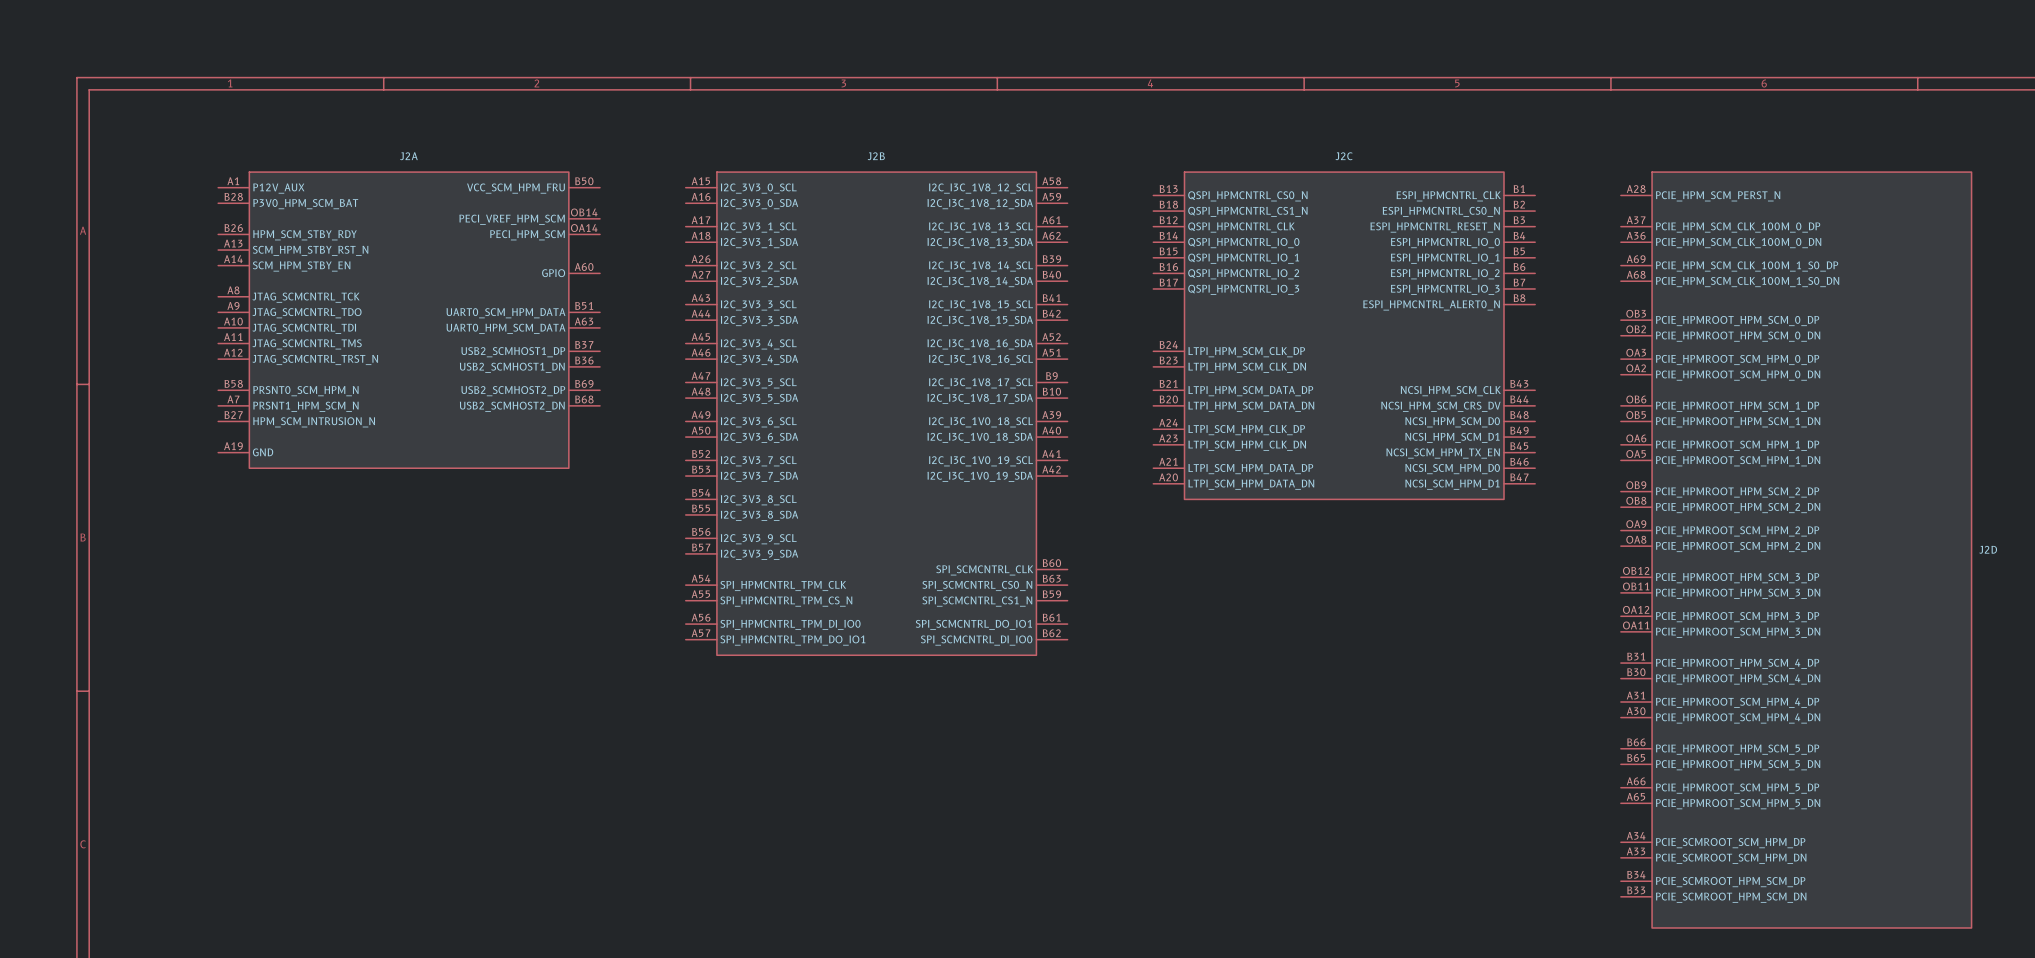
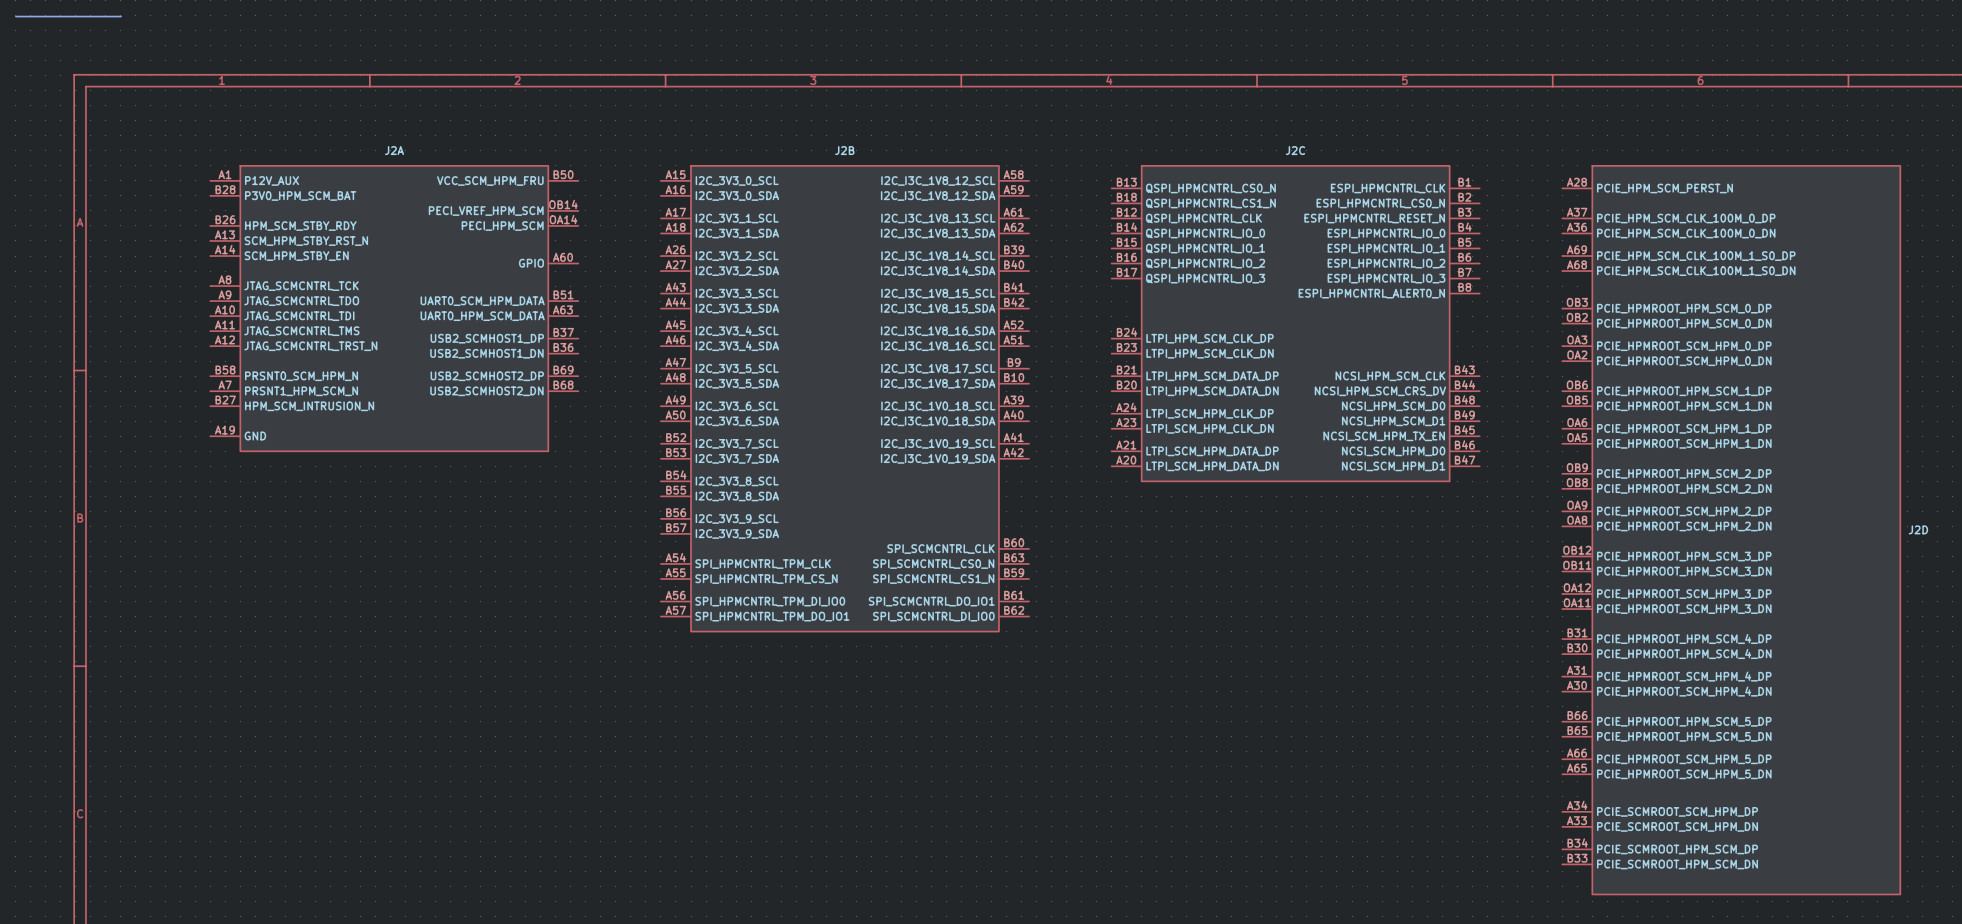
bus: none -> (15, 16) (121, 16)

